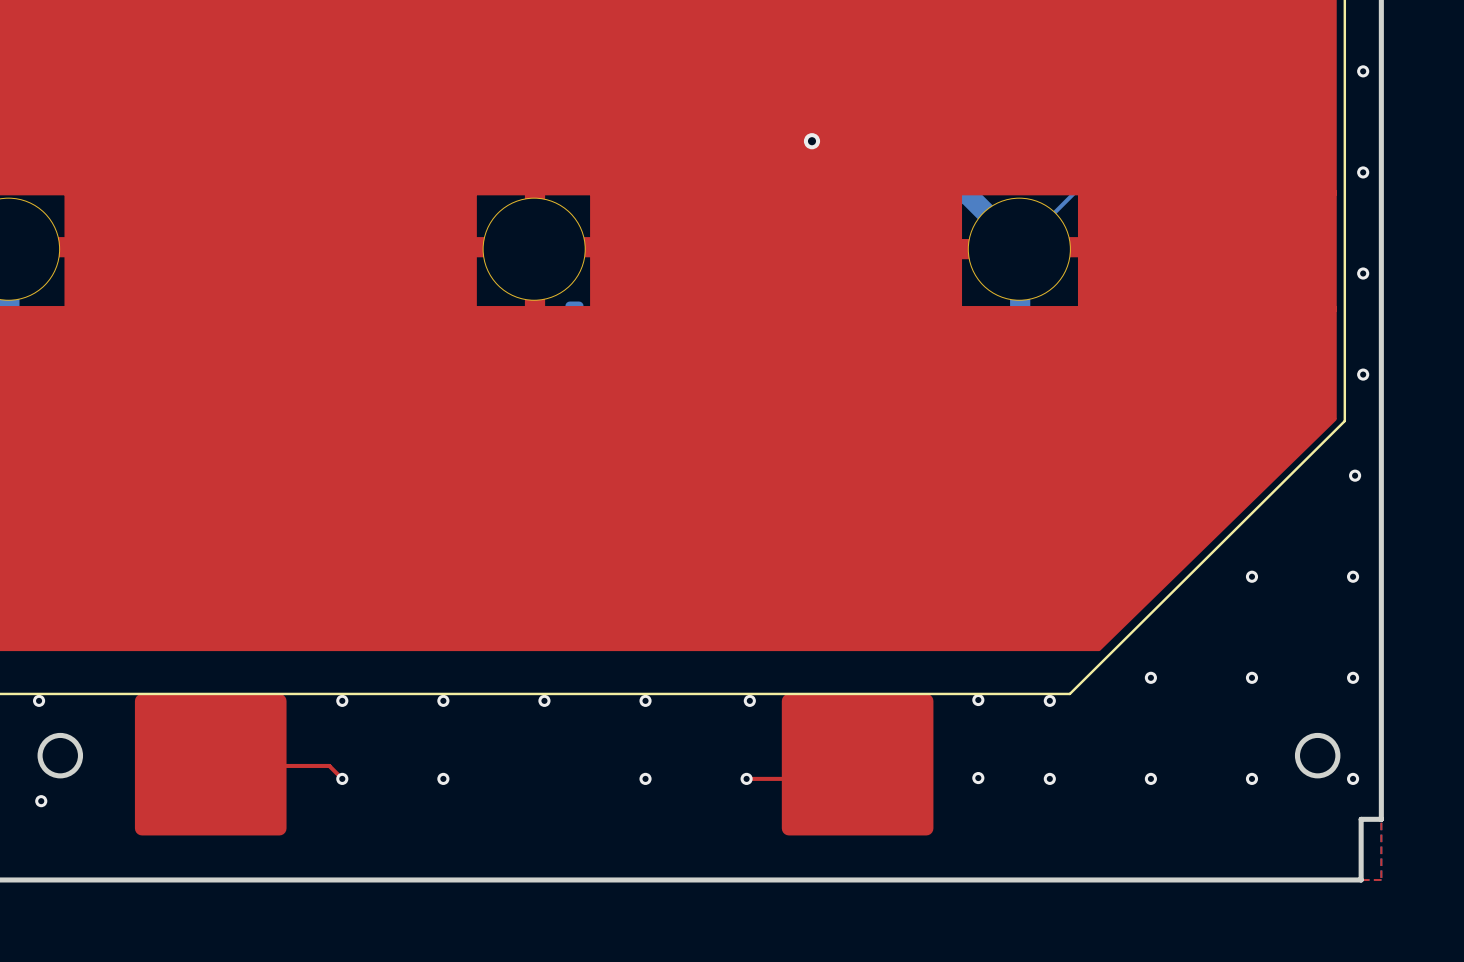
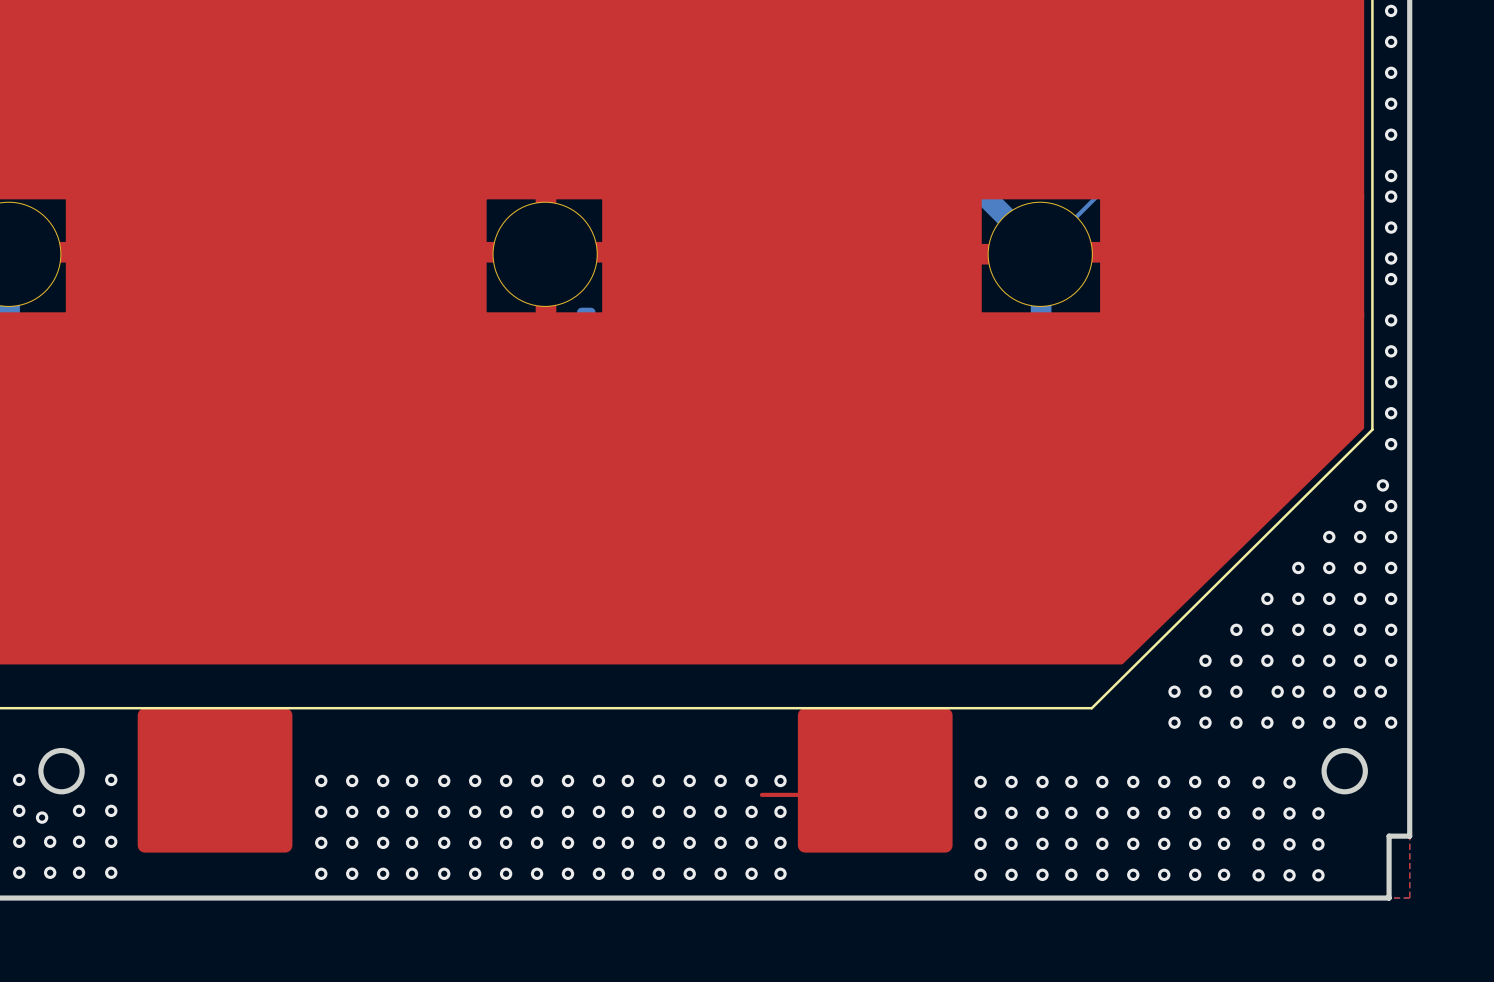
via: none -> (1391, 10)
via: none -> (1391, 41)
via: none -> (1391, 103)
via: none -> (1391, 134)
via: (812, 141) -> none
via: none -> (1391, 196)
via: none -> (1391, 227)
via: none -> (1391, 258)
via: none -> (1391, 320)
via: none -> (1391, 351)
via: none -> (1391, 413)
via: none -> (1391, 444)
via: none -> (1360, 506)
via: none -> (1391, 506)
via: none -> (1329, 537)
via: none -> (1360, 537)
via: none -> (1391, 537)
via: none -> (1298, 567)
via: none -> (1329, 567)
via: none -> (1360, 567)
via: none -> (1391, 567)
via position: (1251, 576) -> (1267, 598)
via position: (1353, 576) -> (1391, 598)
via: none -> (1298, 598)
via: none -> (1329, 598)
via: none -> (1360, 598)
via: none -> (1236, 629)
via: none -> (1267, 629)
via: none -> (1298, 629)
via: none -> (1329, 629)
via: none -> (1360, 629)
via: none -> (1391, 629)
via: none -> (1205, 660)
via: none -> (1236, 660)
via: none -> (1267, 660)
via: none -> (1298, 660)
via: none -> (1329, 660)
via: none -> (1360, 660)
via: none -> (1391, 660)
via: none -> (1205, 691)
via: none -> (1236, 691)
via: none -> (1298, 691)
via: none -> (1329, 691)
via: none -> (1360, 691)
via: (39, 700) -> none
via: (342, 700) -> none
via: (443, 700) -> none
via: (544, 700) -> none
via: (645, 700) -> none
via: (749, 700) -> none
via: (978, 700) -> none
via: (1049, 700) -> none
via: none -> (1174, 722)
via: none -> (1205, 722)
via: none -> (1236, 722)
via: none -> (1267, 722)
via: none -> (1298, 722)
via: none -> (1329, 722)
via: none -> (1360, 722)
via: none -> (1391, 722)
via: none -> (19, 779)
via: none -> (111, 779)
top track: (218, 765) (329, 765) (342, 778) -> none
via: none -> (321, 780)
via: none -> (352, 780)
via: none -> (383, 780)
via: none -> (412, 780)
via: none -> (444, 780)
via: none -> (475, 780)
via: none -> (506, 780)
via: none -> (537, 780)
via: none -> (568, 780)
via: none -> (598, 780)
via: none -> (627, 780)
via: none -> (658, 780)
via: none -> (689, 780)
via: none -> (720, 780)
via: none -> (751, 780)
via: none -> (780, 780)
via: none -> (980, 781)
via: none -> (1011, 781)
via: none -> (1042, 781)
via: none -> (1071, 781)
via: none -> (1102, 781)
via: none -> (1133, 781)
via: none -> (1164, 781)
via: none -> (1195, 781)
via: none -> (1224, 781)
via: none -> (1258, 782)
via: (342, 778) -> none
via: (443, 778) -> none
via: (645, 778) -> none
via: (746, 778) -> none
via: (978, 778) -> none
via: (1049, 778) -> none
via: (1150, 778) -> none
via position: (1251, 778) -> (1289, 782)
via: (1353, 778) -> none
via: none -> (19, 810)
via: none -> (79, 810)
via: none -> (111, 810)
via: none -> (321, 811)
via: none -> (352, 811)
via: none -> (383, 811)
via: none -> (412, 811)
via: none -> (444, 811)
via: none -> (475, 811)
via: none -> (506, 811)
via: none -> (537, 811)
via: none -> (568, 811)
via: none -> (598, 811)
via: none -> (627, 811)
via: none -> (658, 811)
via: none -> (689, 811)
via: none -> (720, 811)
via: none -> (751, 811)
via: none -> (780, 811)
via: none -> (980, 812)
via: none -> (1011, 812)
via: none -> (1042, 812)
via: none -> (1071, 812)
via: none -> (1102, 812)
via: none -> (1133, 812)
via: none -> (1164, 812)
via: none -> (1195, 812)
via: none -> (1224, 812)
via: none -> (1258, 813)
via: none -> (1289, 813)
via: none -> (1318, 813)
via: none -> (19, 841)
via: none -> (50, 841)
via: none -> (79, 841)
via: none -> (111, 841)
via: none -> (321, 842)
via: none -> (352, 842)
via: none -> (383, 842)
via: none -> (412, 842)
via: none -> (444, 842)
via: none -> (475, 842)
via: none -> (506, 842)
via: none -> (537, 842)
via: none -> (568, 842)
via: none -> (598, 842)
via: none -> (627, 842)
via: none -> (658, 842)
via: none -> (689, 842)
via: none -> (720, 842)
via: none -> (751, 842)
via: none -> (780, 842)
via: none -> (980, 843)
via: none -> (1011, 843)
via: none -> (1042, 843)
via: none -> (1071, 843)
via: none -> (1102, 843)
via: none -> (1133, 843)
via: none -> (1164, 843)
via: none -> (1195, 843)
via: none -> (1224, 843)
via: none -> (1258, 844)
via: none -> (1289, 844)
via: none -> (1318, 844)
via: none -> (19, 872)
via: none -> (50, 872)
via: none -> (79, 872)
via: none -> (111, 872)
via: none -> (321, 873)
via: none -> (352, 873)
via: none -> (383, 873)
via: none -> (412, 873)
via: none -> (444, 873)
via: none -> (475, 873)
via: none -> (506, 873)
via: none -> (537, 873)
via: none -> (568, 873)
via: none -> (598, 873)
via: none -> (627, 873)
via: none -> (658, 873)
via: none -> (689, 873)
via: none -> (720, 873)
via: none -> (751, 873)
via: none -> (780, 873)
via: none -> (980, 874)
via: none -> (1011, 874)
via: none -> (1042, 874)
via: none -> (1071, 874)
via: none -> (1102, 874)
via: none -> (1133, 874)
via: none -> (1164, 874)
via: none -> (1195, 874)
via: none -> (1224, 874)
via: none -> (1258, 875)
via: none -> (1289, 875)
via: none -> (1318, 875)

